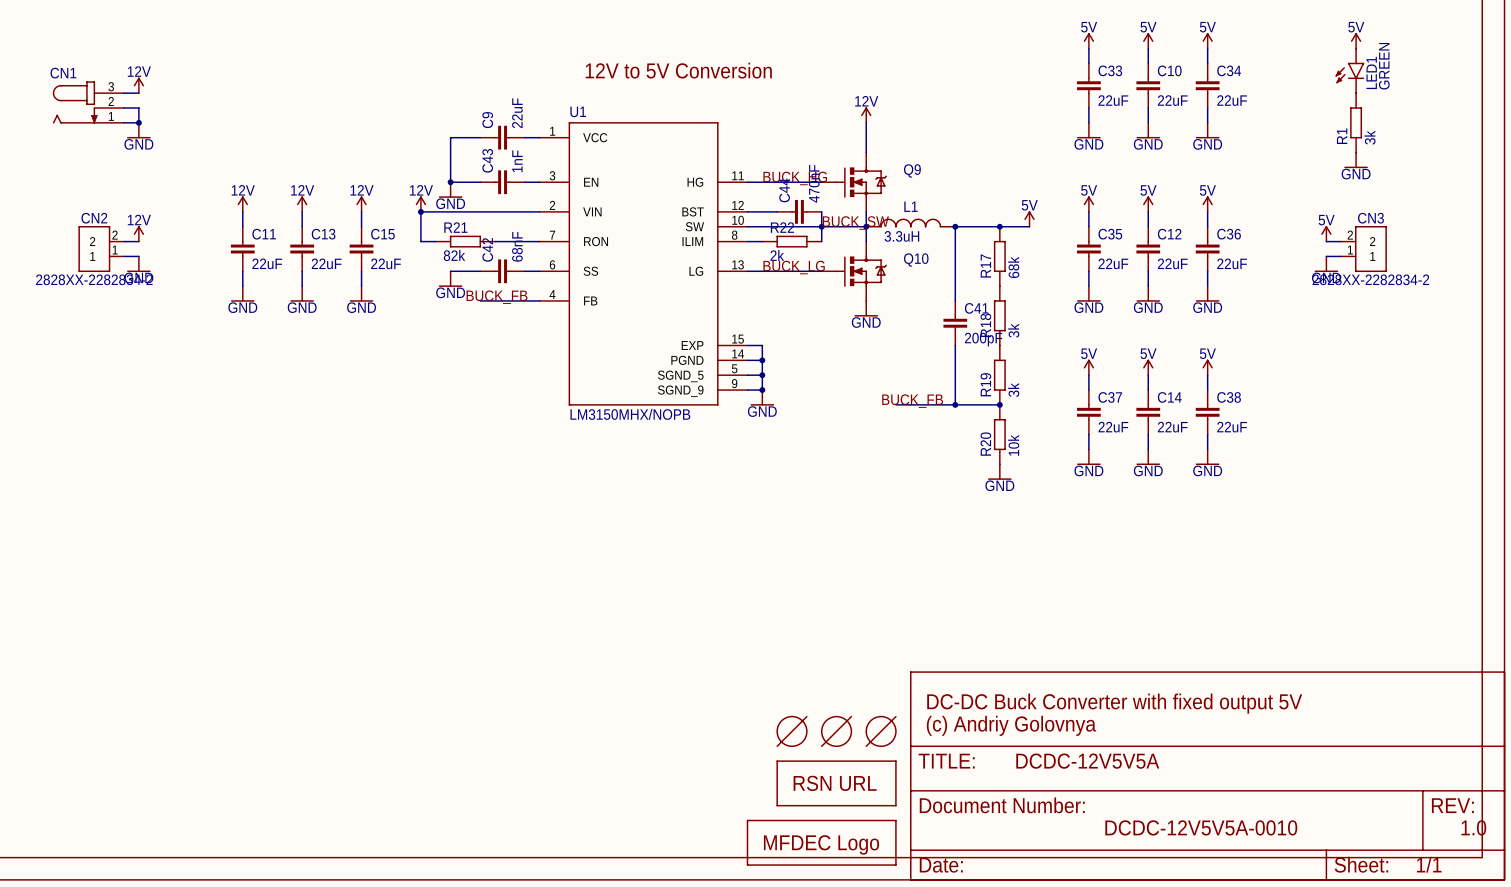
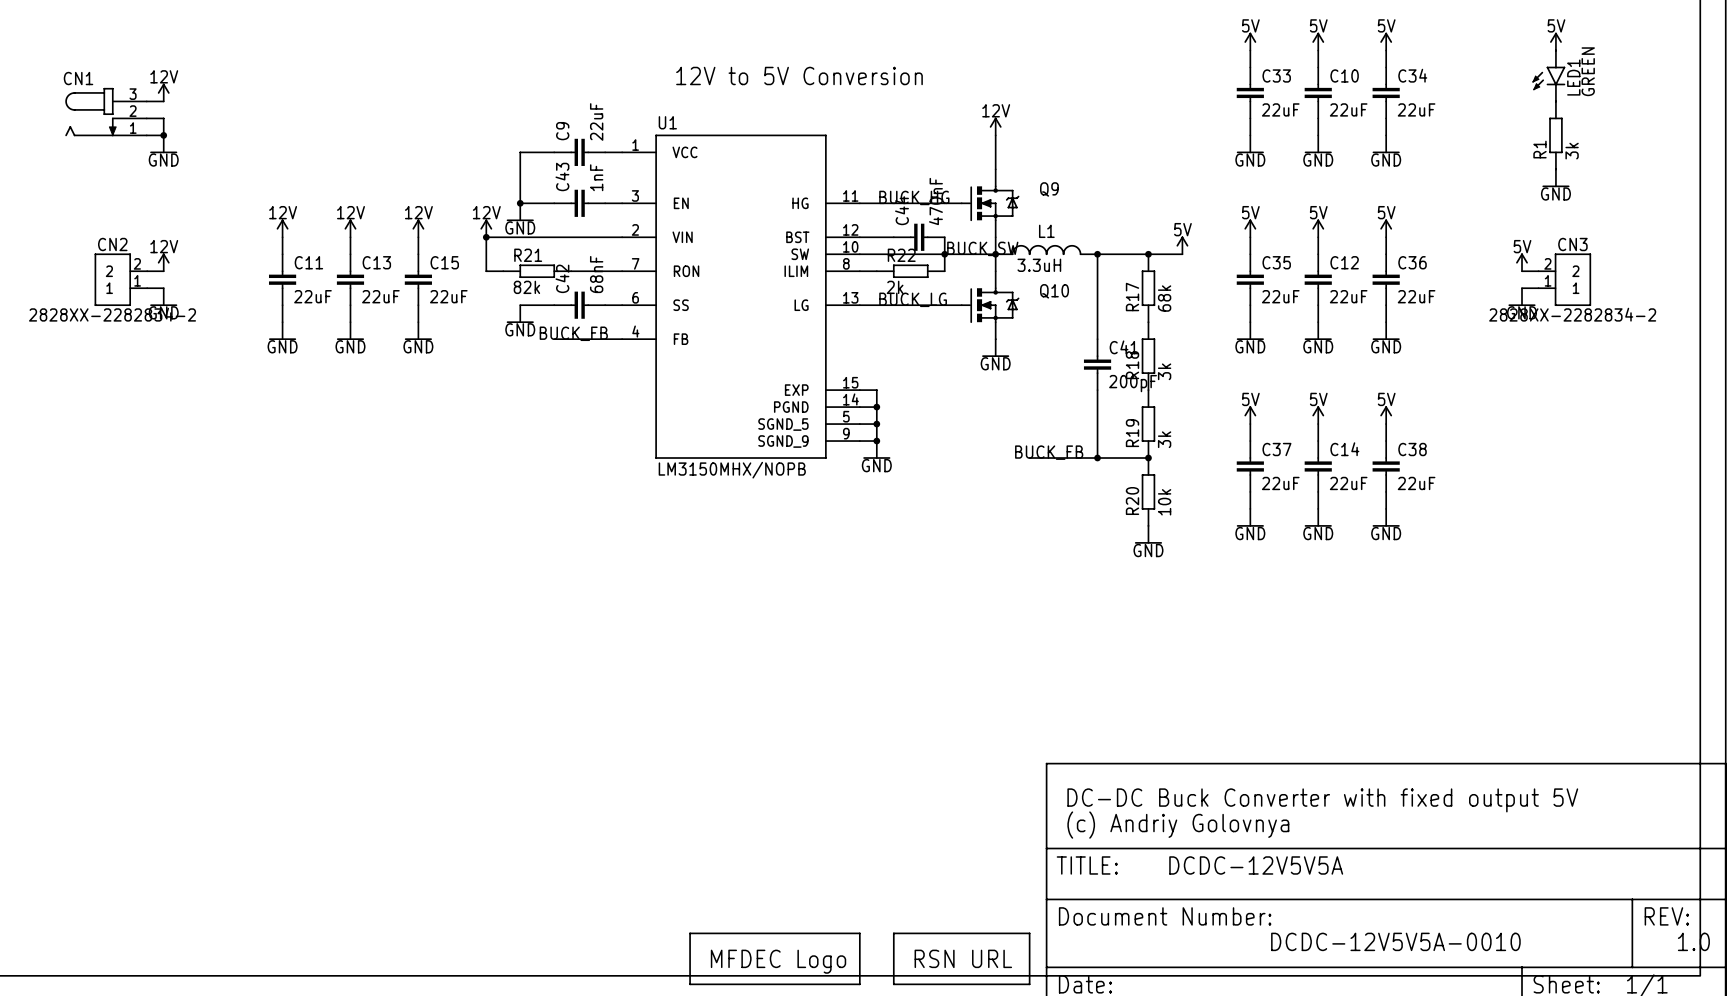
part: (792, 731) -> none
part: (836, 731) -> none
part: (881, 731) -> none
part position: (836, 783) -> (961, 958)
part: none -> (774, 958)
part: (821, 842) -> none

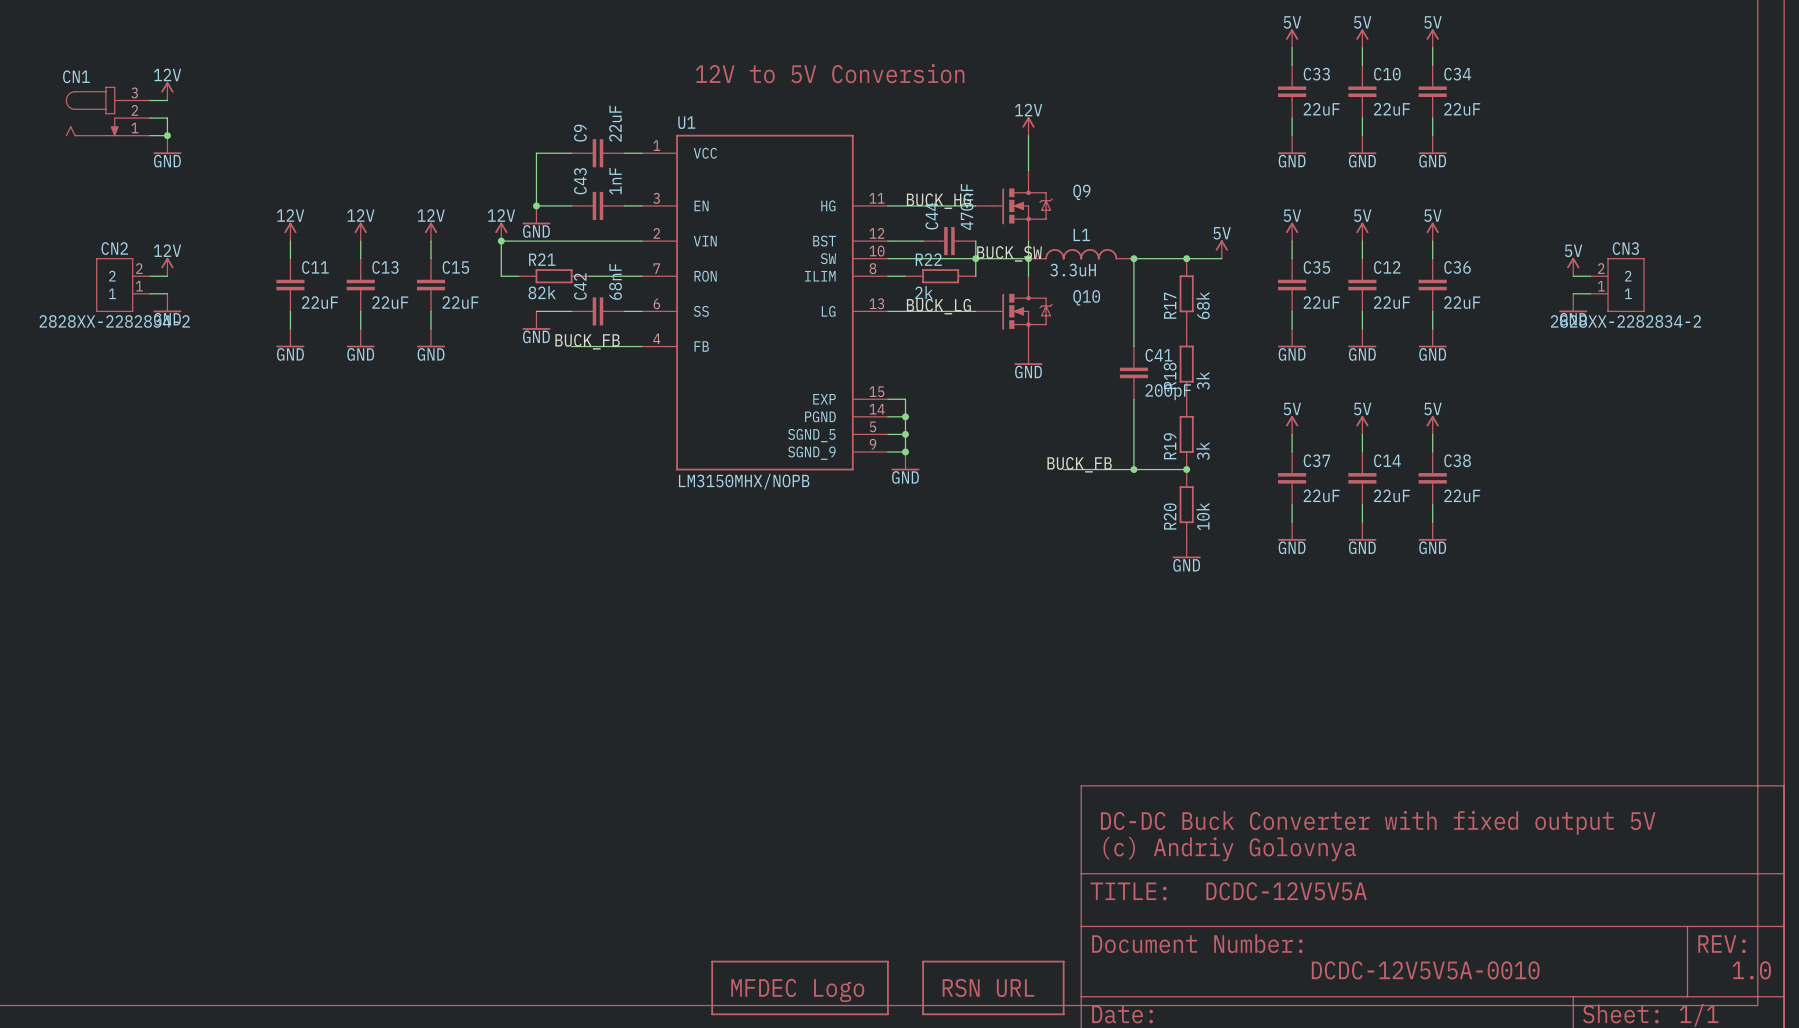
power symbol: 5V (1555, 41) -> none
LED1: GREEN (1548, 75) -> none
R1: 3k (1555, 135) -> none
power symbol: GND (1555, 178) -> none

